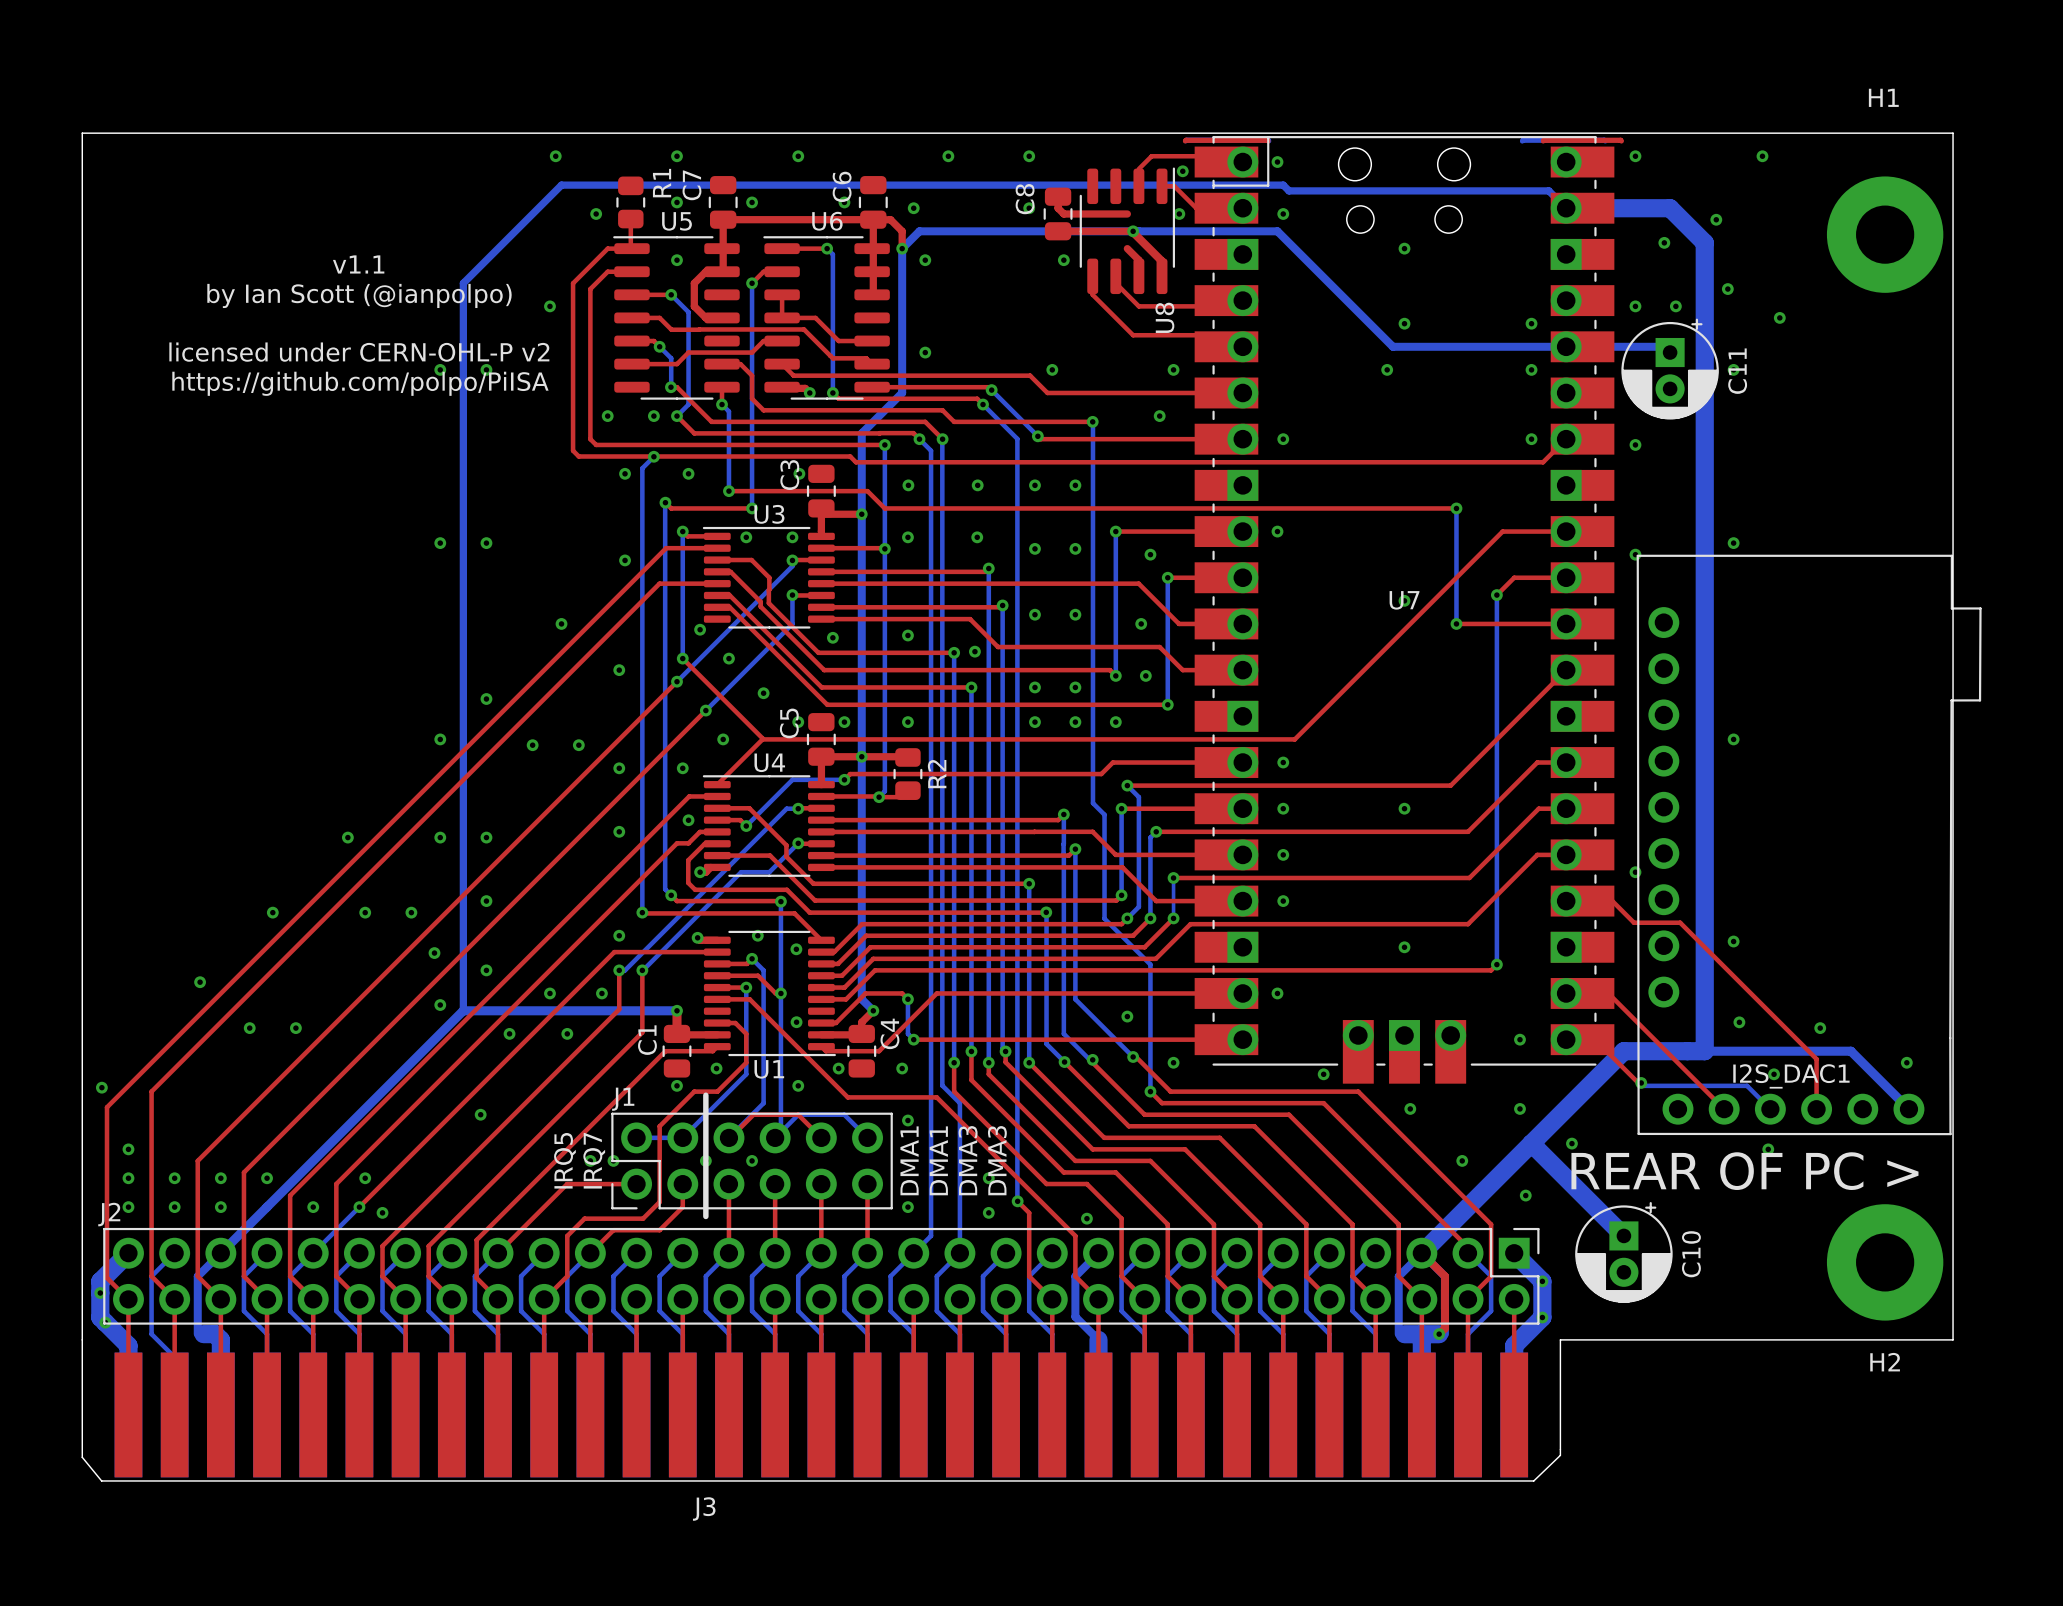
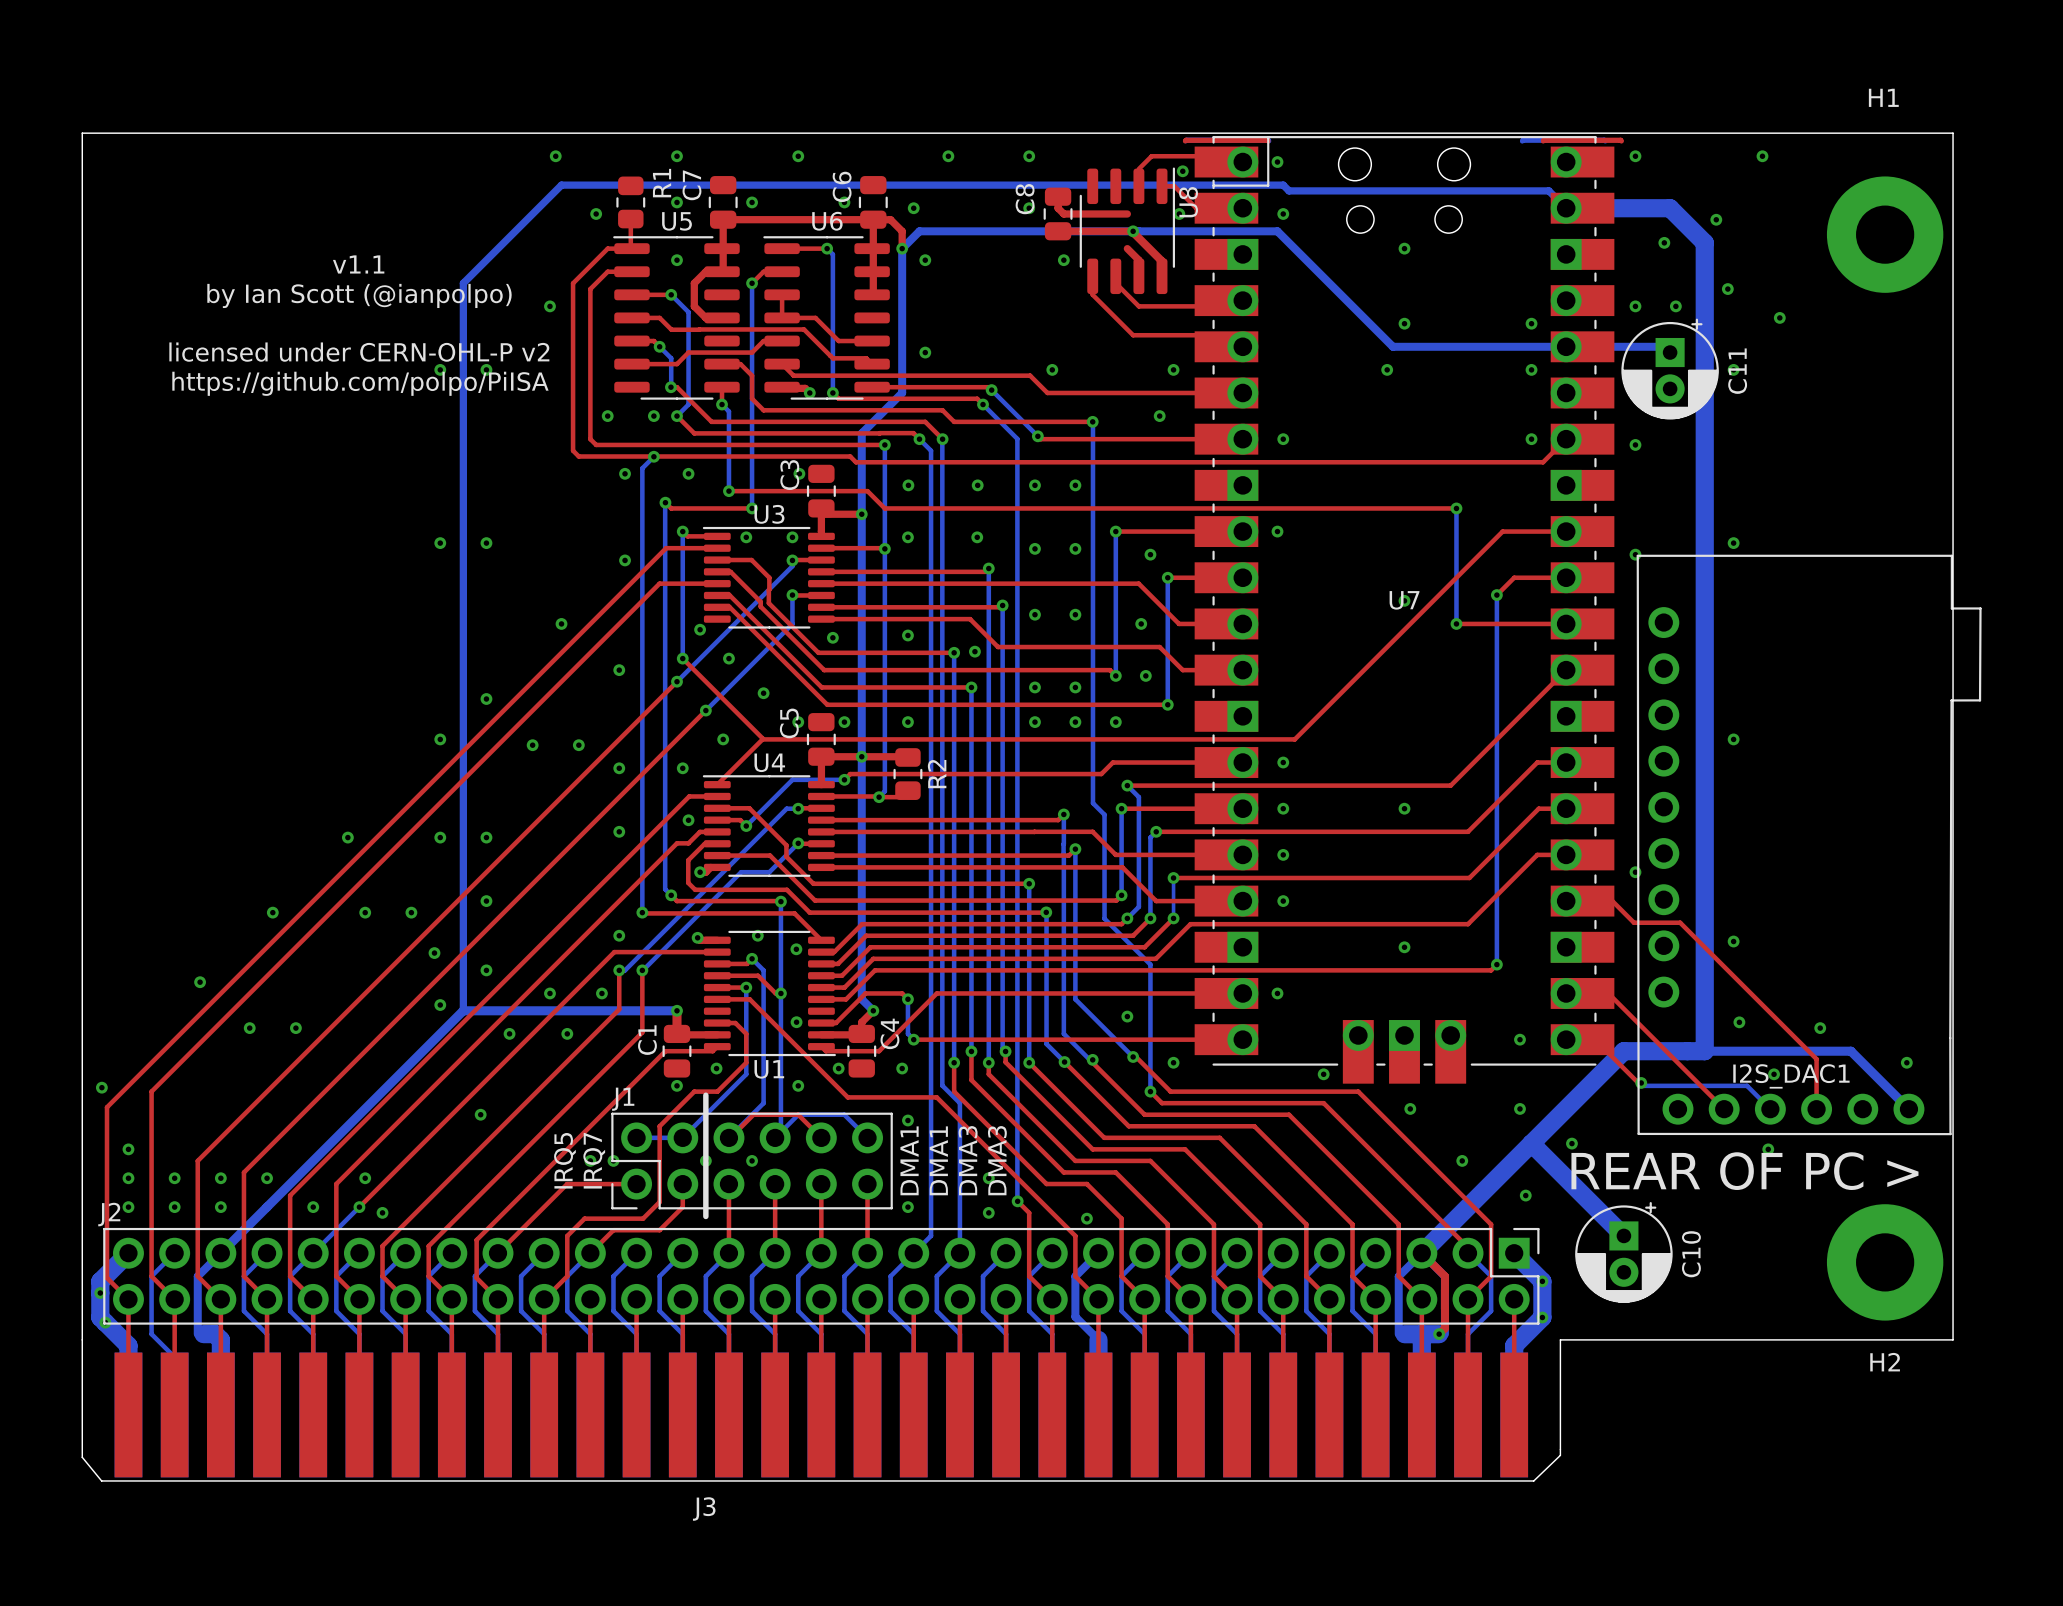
U8 name position: U8 (1164, 317) -> U8 (1188, 202)

